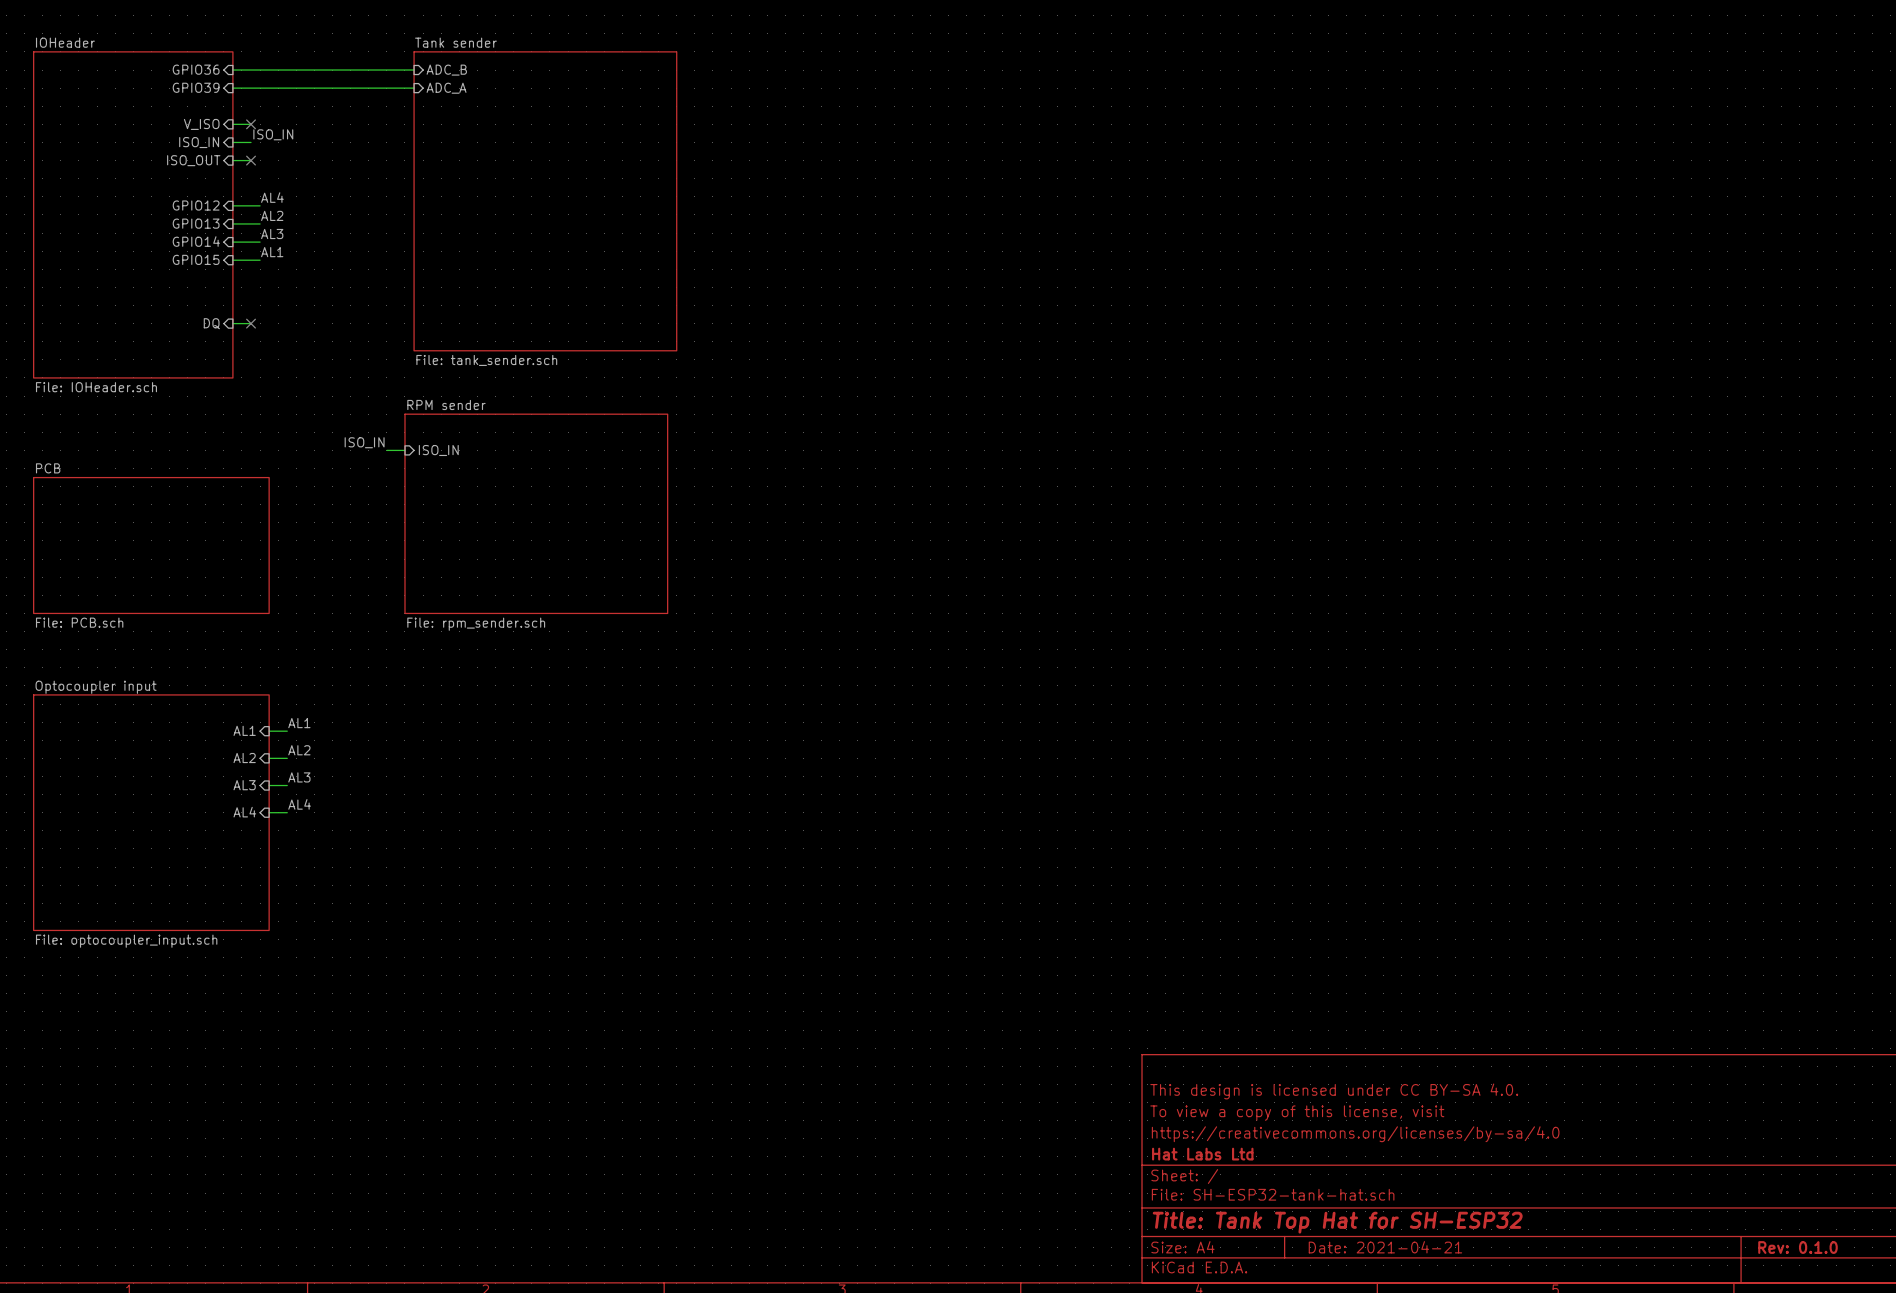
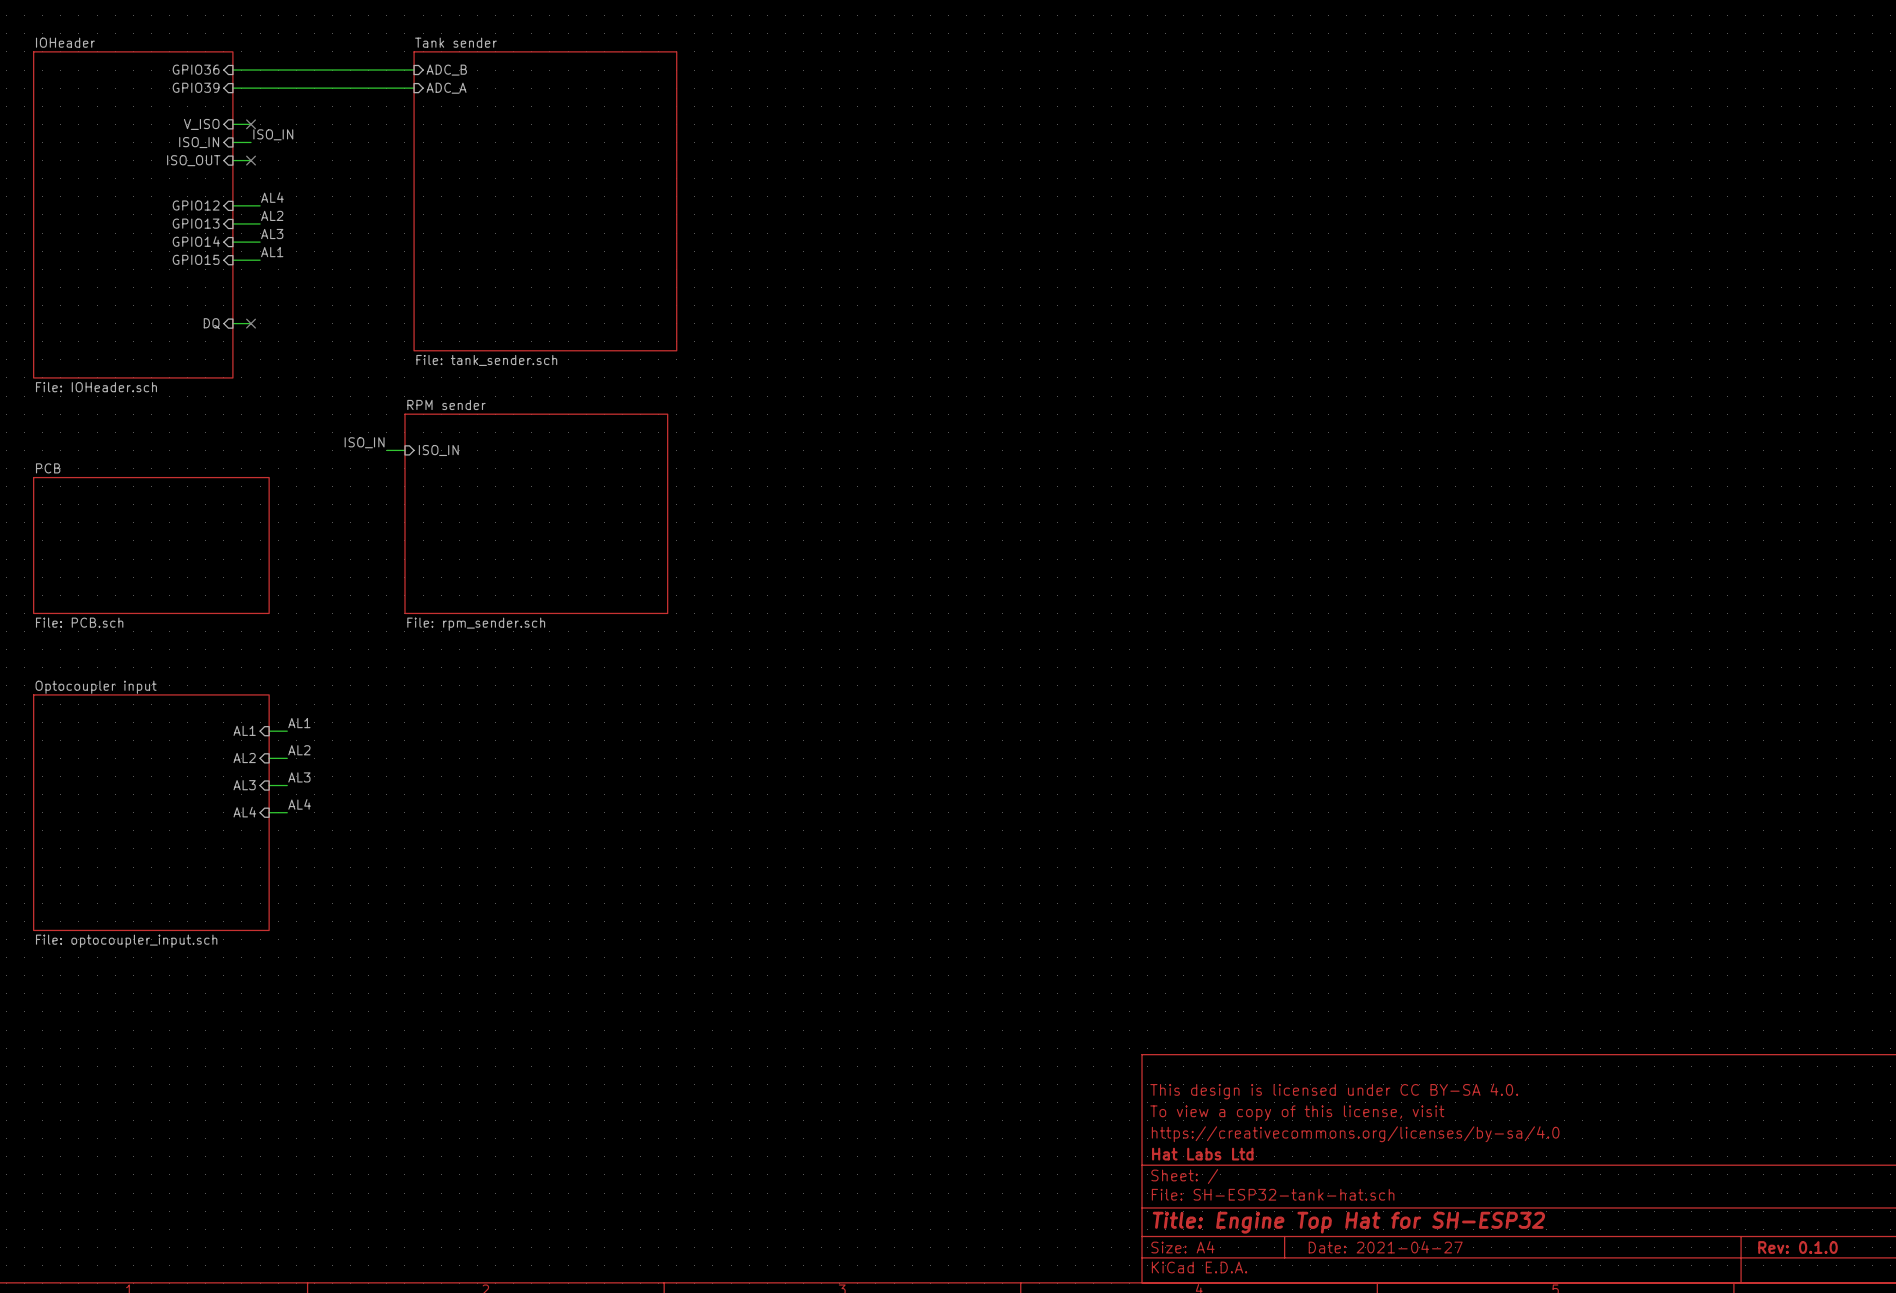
title block: Title: Tank Top Hat for SH-ESP32 (1337, 1222) -> Title: Engine Top Hat for SH-ESP32 (1348, 1222)
title block: Date: 2021-04-21 (1385, 1247) -> Date: 2021-04-27 (1385, 1247)

